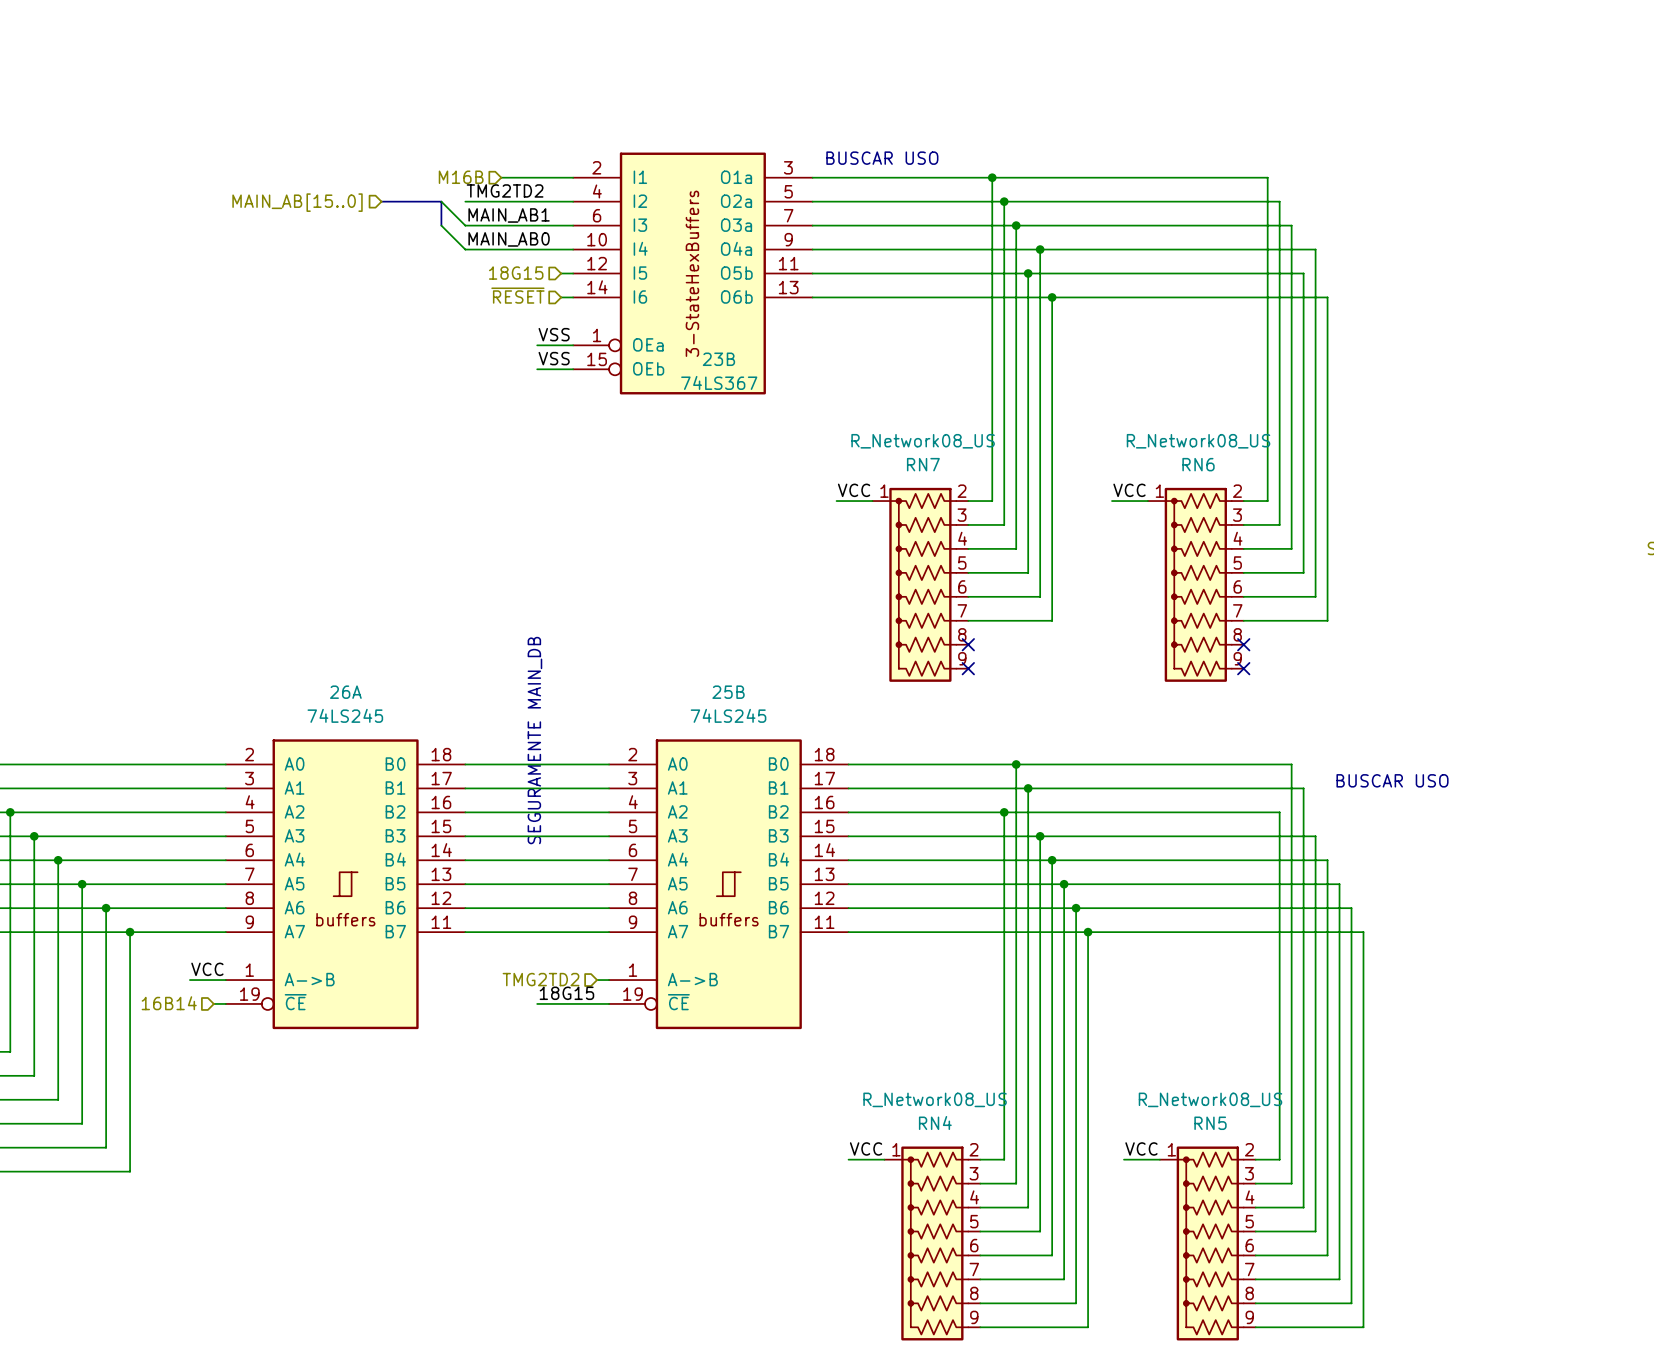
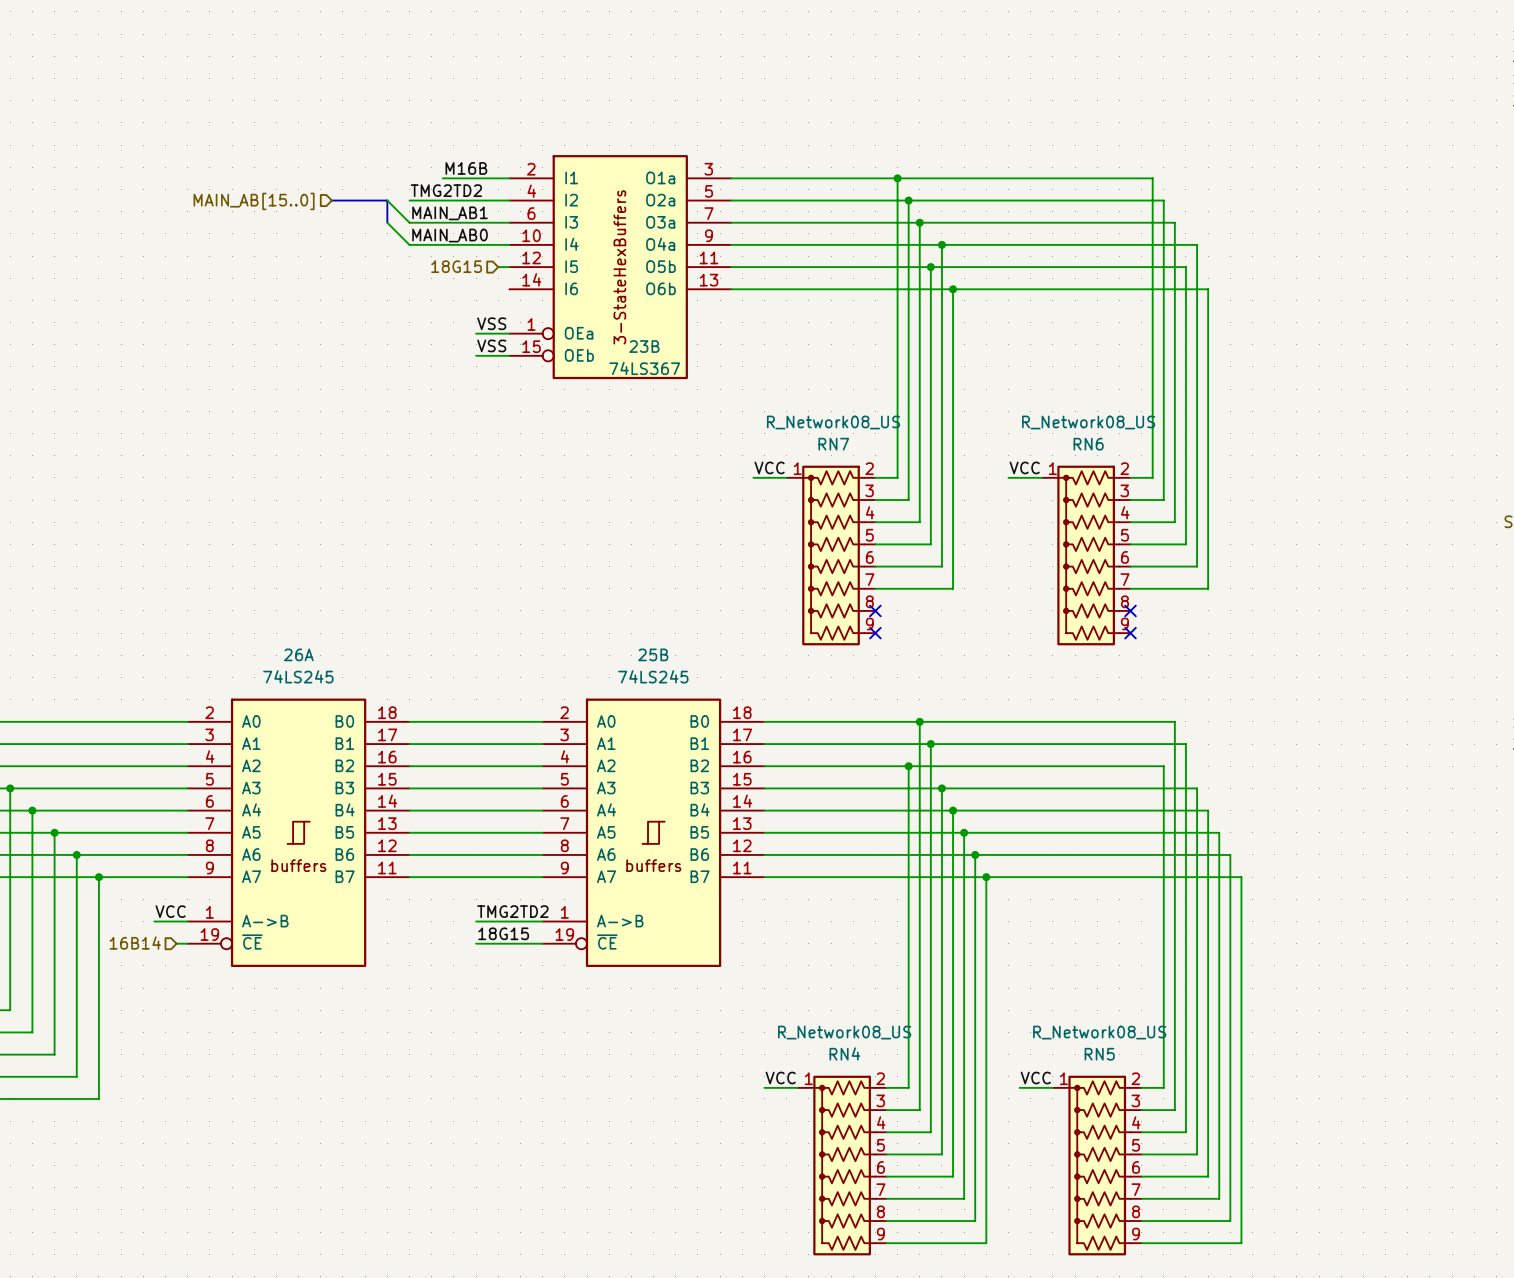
text: BUSCAR USO (882, 158) -> none
label: none -> M16B (466, 168)
hierarchical label: M16B (461, 177) -> none
hierarchical label: ~{RESET} (517, 295) -> none
wire: (561, 297) (573, 297) -> none
text: SEGURAMENTE MAIN_DB (534, 740) -> none
text: BUSCAR USO (1392, 780) -> none
label: none -> TMG2TD2 (512, 911)
hierarchical label: TMG2TD2 (541, 979) -> none
wire: none -> (476, 921) (531, 921)

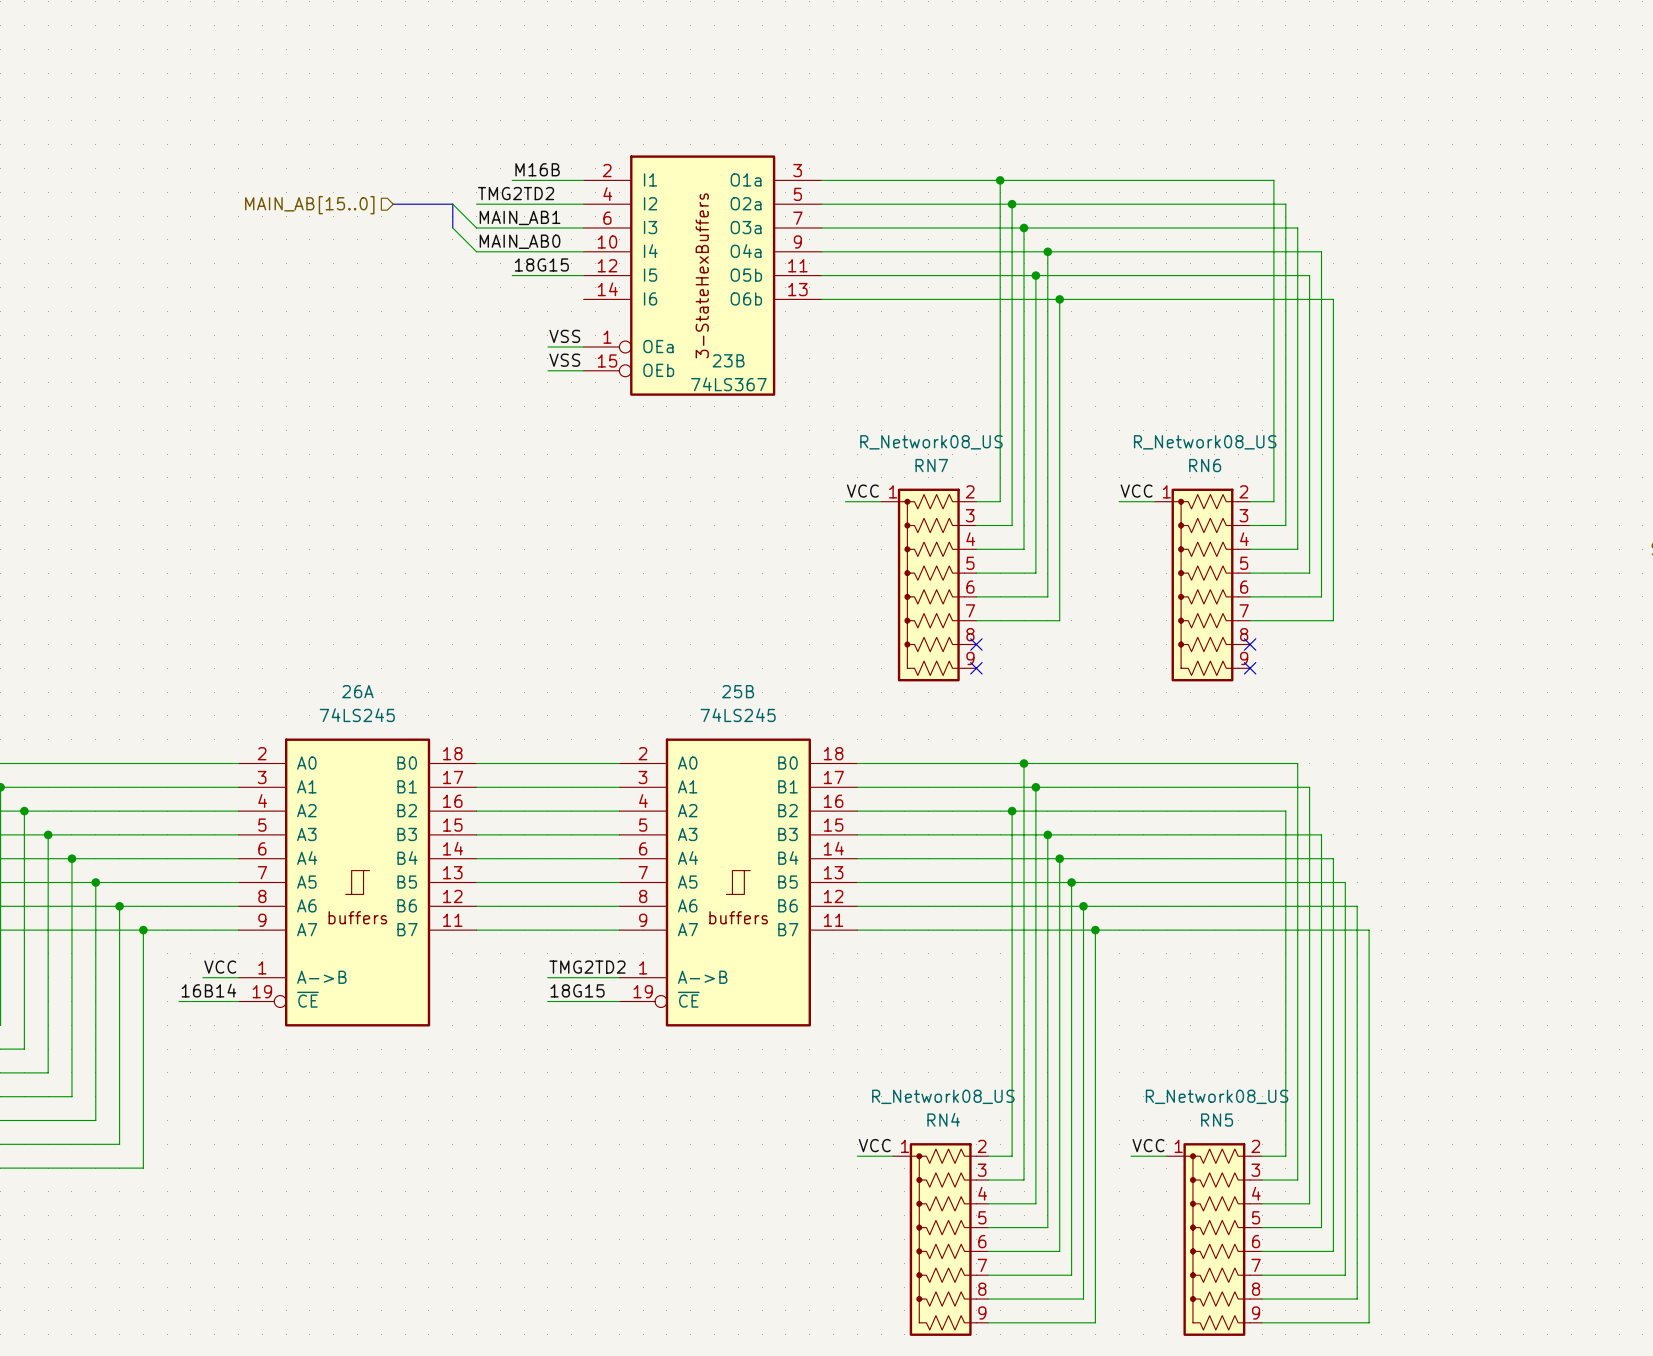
label: none -> 18G15 (541, 264)
hierarchical label: 18G15 (456, 266) -> none
wire: none -> (512, 275) (571, 275)
label: none -> 16B14 (208, 990)
wire: none -> (179, 1001) (226, 1001)
hierarchical label: 16B14 (135, 943) -> none

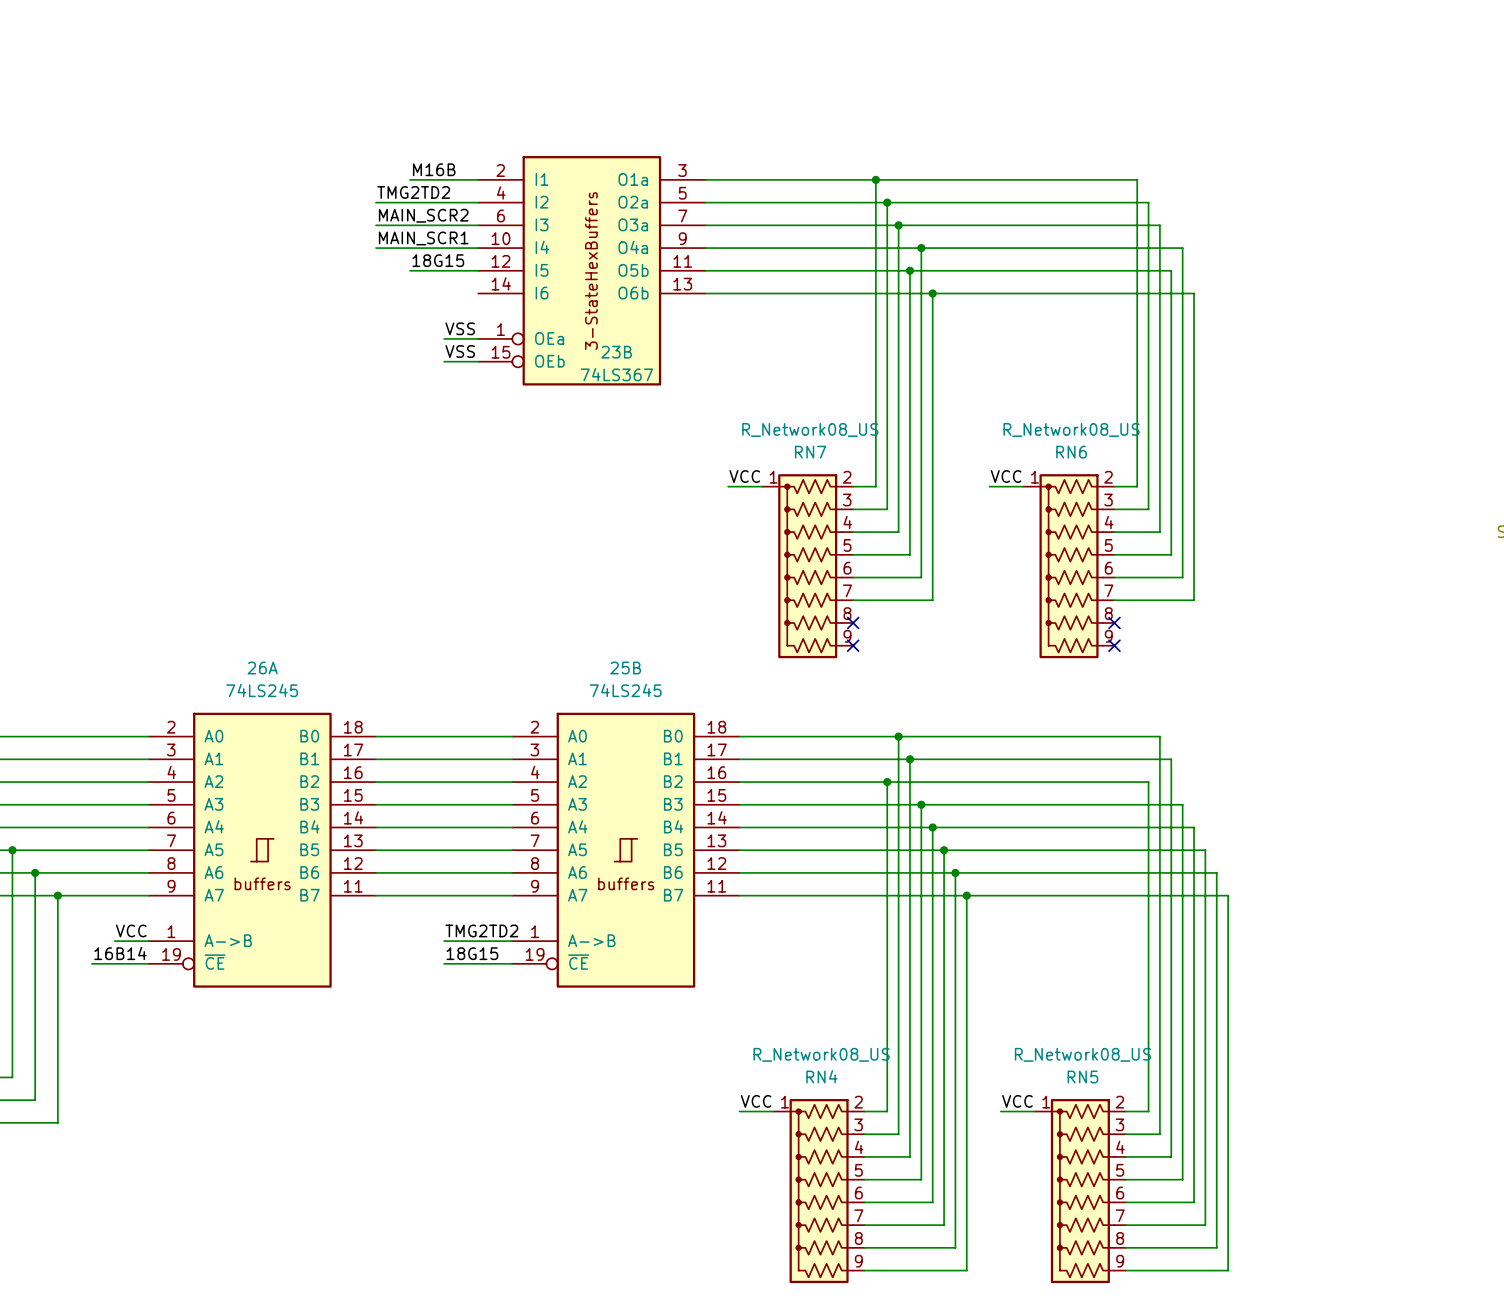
bus: (393, 204) (452, 204) (452, 227) -> none
wire: (452, 204) (476, 227) -> none
hierarchical label: MAIN_AB[15..0] (309, 205) -> none
label: MAIN_AB1 (520, 217) -> MAIN_SCR2 (423, 215)
wire: (452, 227) (476, 251) -> none
label: MAIN_AB0 (520, 241) -> MAIN_SCR1 (423, 238)

